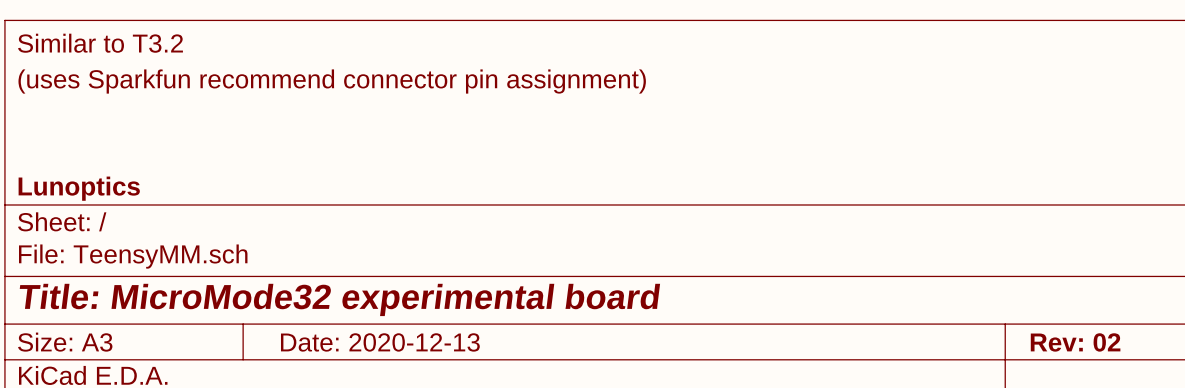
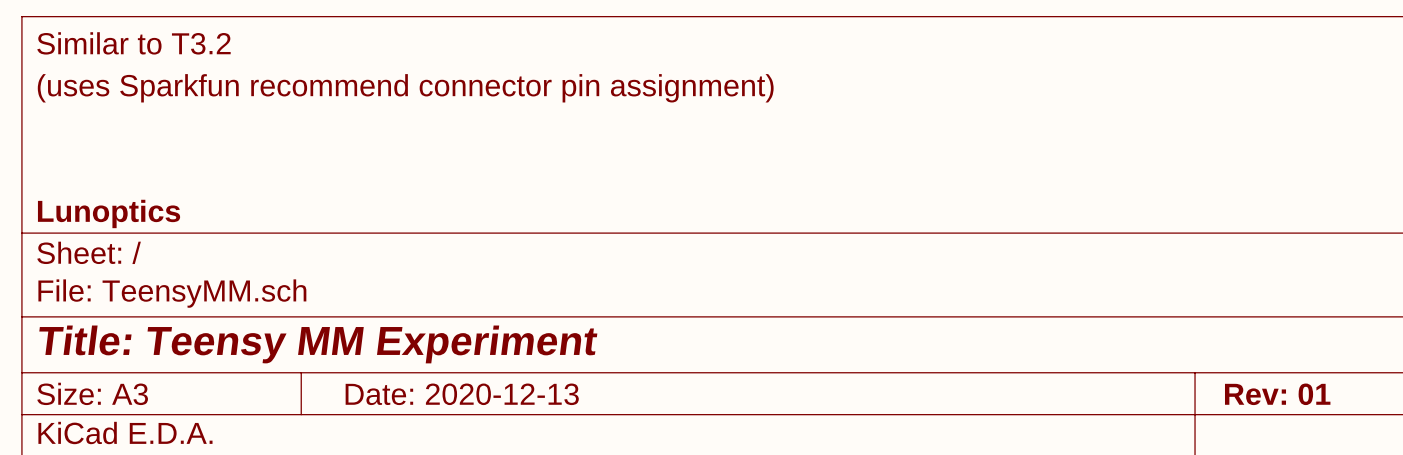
title block: Title: MicroMode32 experimental board (339, 299) -> Title: Teensy MM Experiment (318, 344)
title block: Rev: 02 (1075, 342) -> Rev: 01 (1277, 394)

